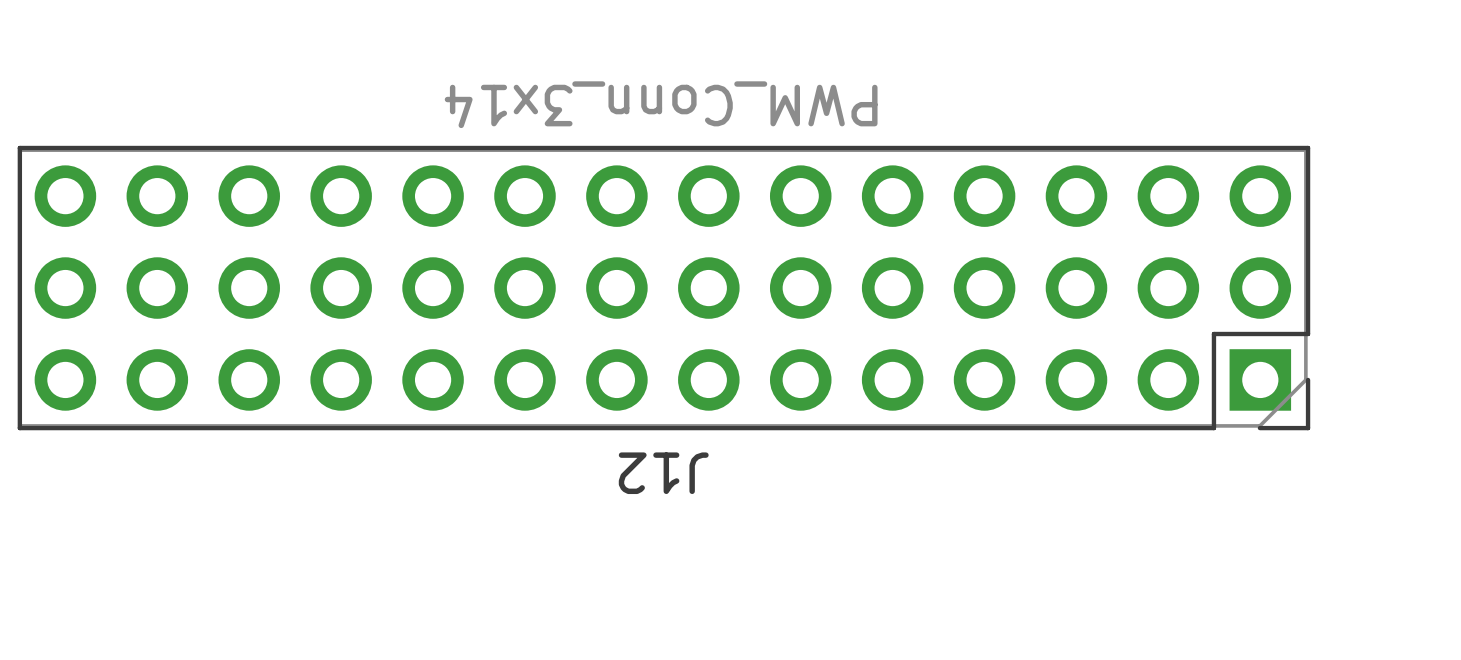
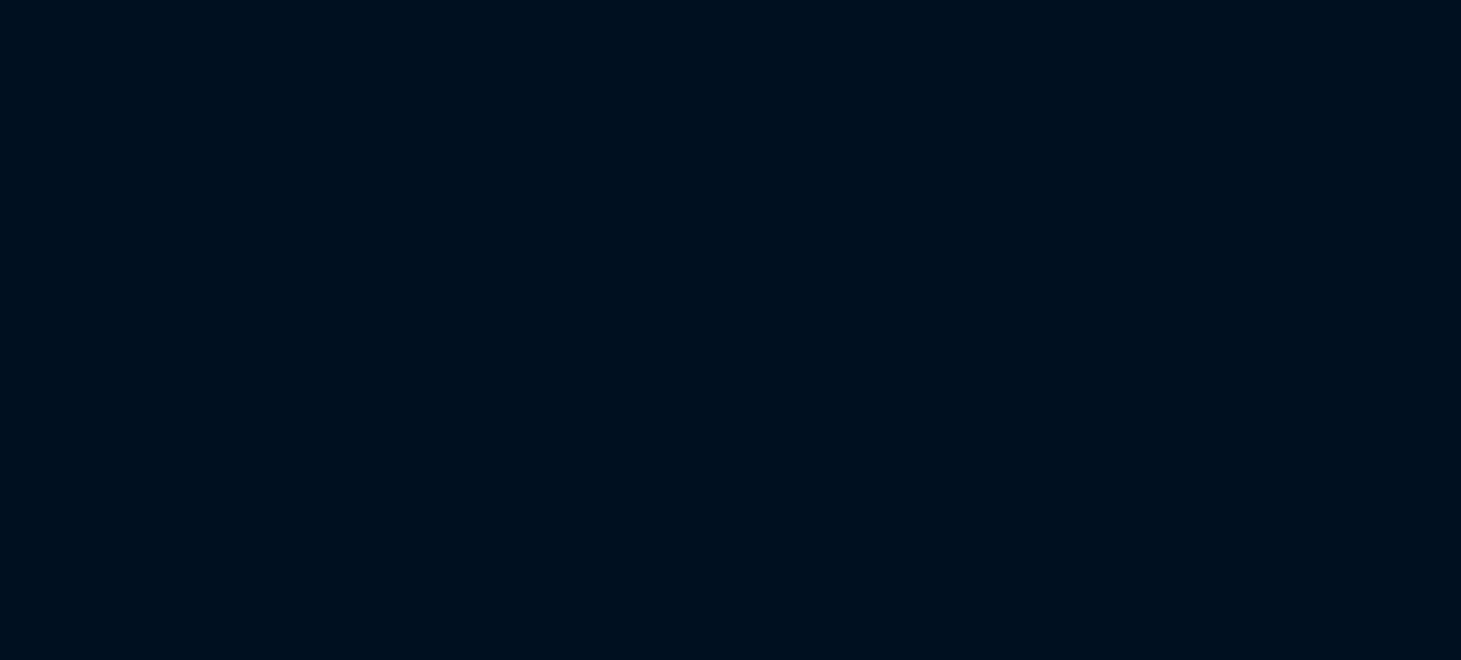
J12: PWM_Conn_3x14 (663, 288) -> none

